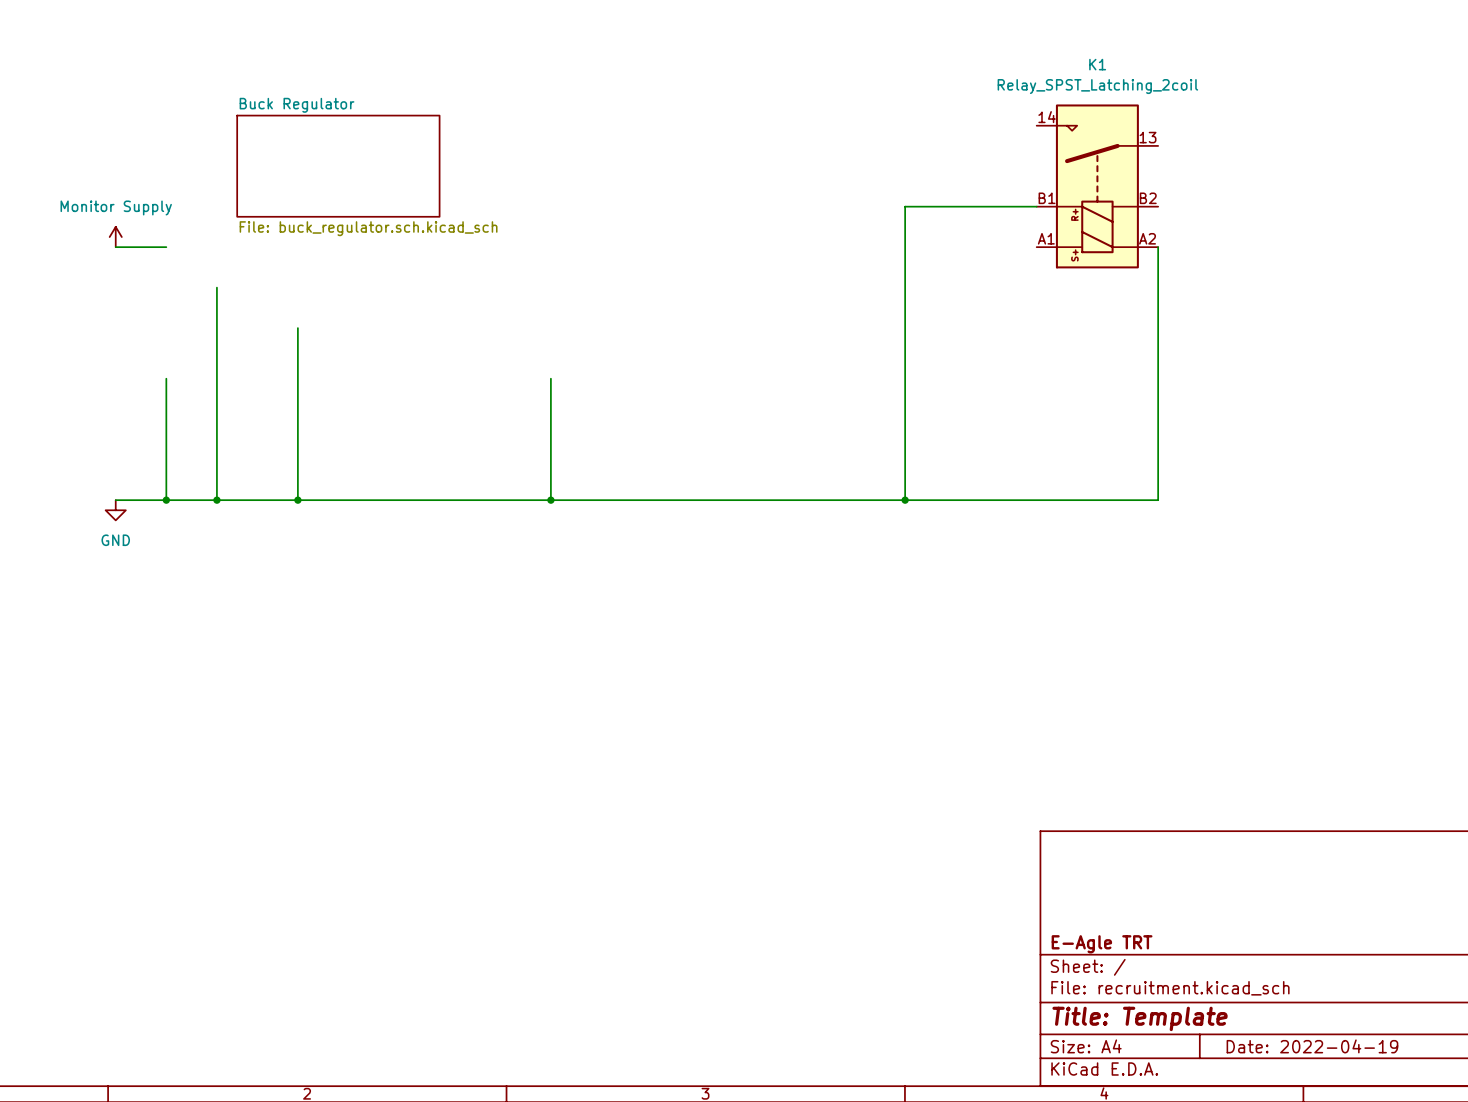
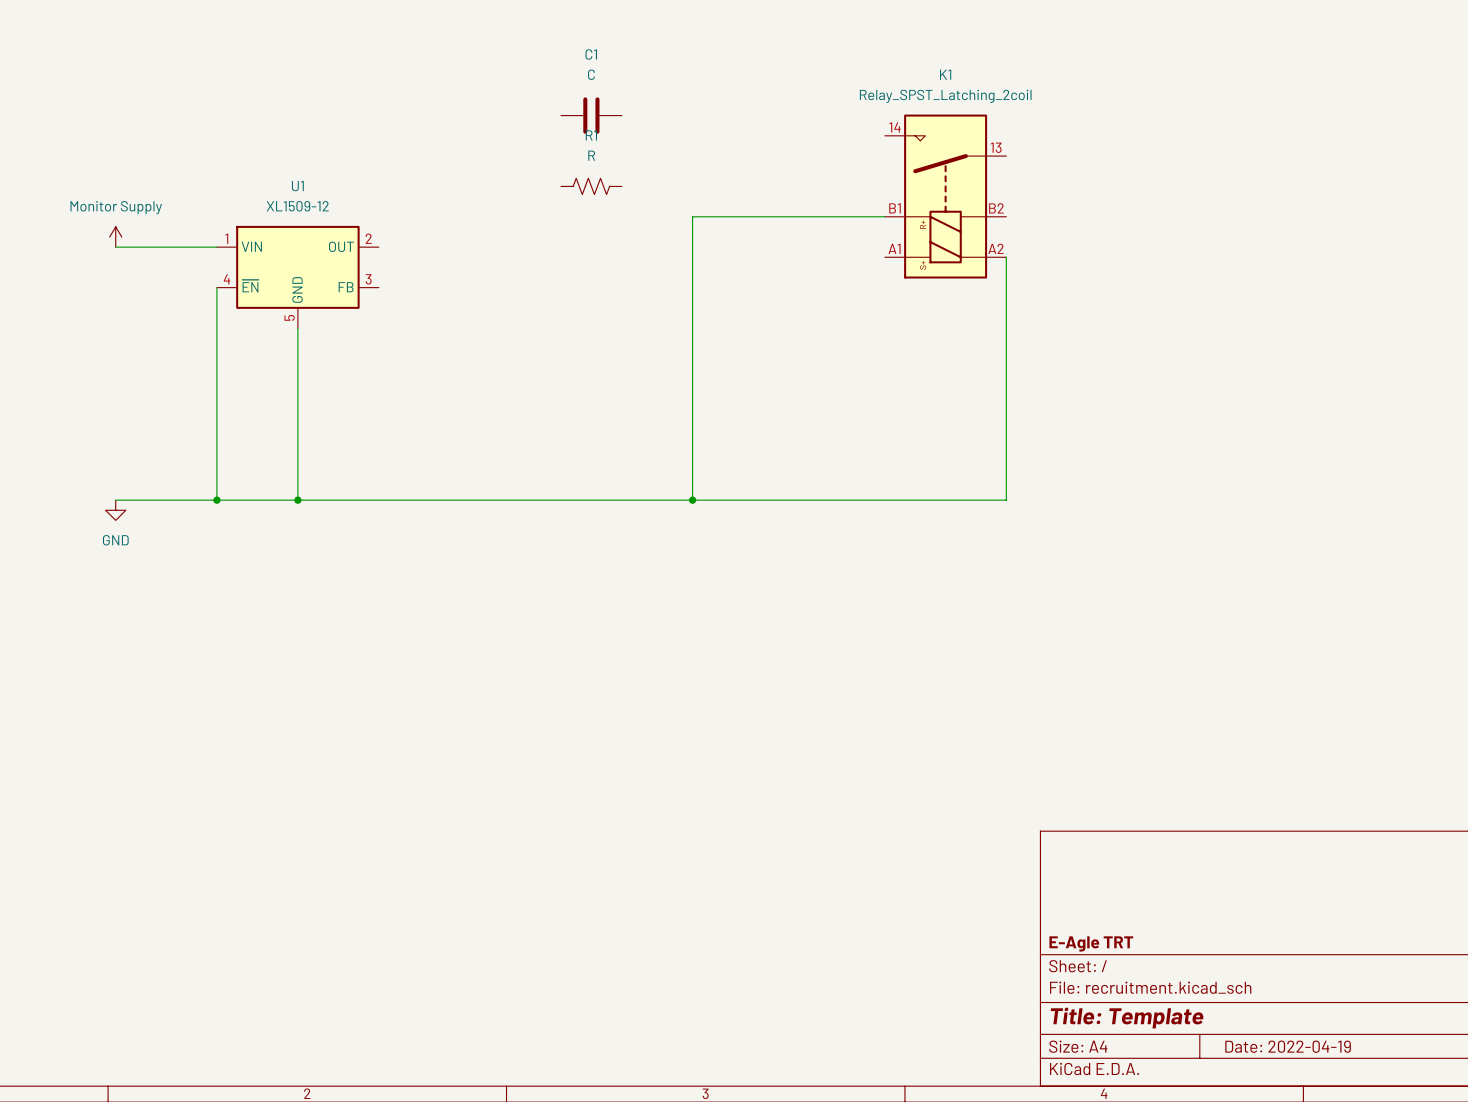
C1: none -> C (591, 115)
sheet Buck Regulator: File: buck_regulator.sch.kicad_sch (338, 166) -> none
R1: none -> R (591, 186)
K1 position: (1097, 186) -> (945, 196)
wire: (1036, 206) (905, 206) (905, 500) -> none
wire: none -> (884, 216) (692, 216) (692, 500)
wire: none -> (166, 247) (216, 247)
wire: (1158, 247) (1158, 500) (1006, 500) -> (1006, 257) (1006, 500)
U1: none -> XL1509-12 (297, 277)
wire: (166, 378) (166, 500) -> none
wire: (550, 378) (550, 500) -> none
junction: (166, 500) -> none
junction: (550, 500) -> none
junction: none -> (692, 500)
junction: (905, 500) -> none

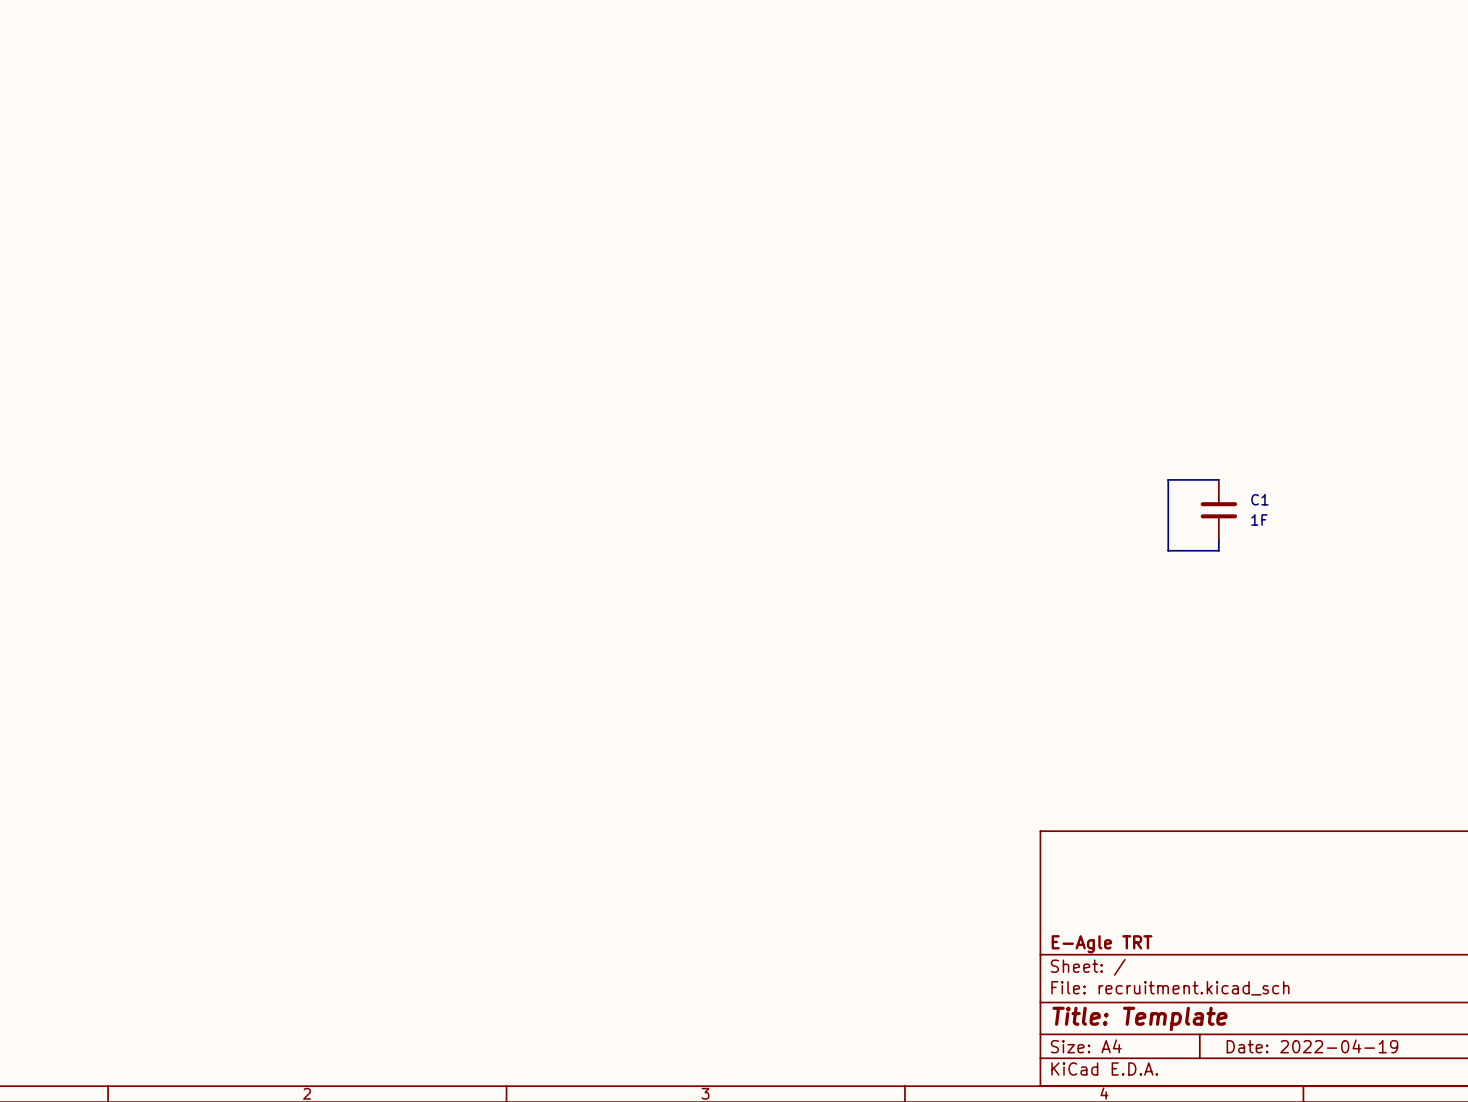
C1 name position: C1 (591, 54) -> C1 (1259, 499)
C1 value: C (591, 74) -> 1F (1259, 520)
C1 rotation: 0° (591, 115) -> 90° clockwise (1218, 510)
C1 position: (591, 115) -> (1218, 510)
R1: R (591, 186) -> none
K1: Relay_SPST_Latching_2coil (945, 196) -> none
wire: (884, 216) (692, 216) (692, 500) -> none
power symbol: Monitor Supply (115, 237) -> none
wire: (115, 247) (216, 247) -> none
wire: (1006, 257) (1006, 500) (115, 500) -> none
U1: XL1509-12 (297, 277) -> none
wire: (216, 287) (216, 500) -> none
wire: (297, 328) (297, 500) -> none
wire: none -> (1218, 479) (1168, 479) (1168, 550) (1218, 550) (1218, 540)
junction: (216, 500) -> none
junction: (297, 500) -> none
junction: (692, 500) -> none
power symbol: GND (115, 510) -> none

